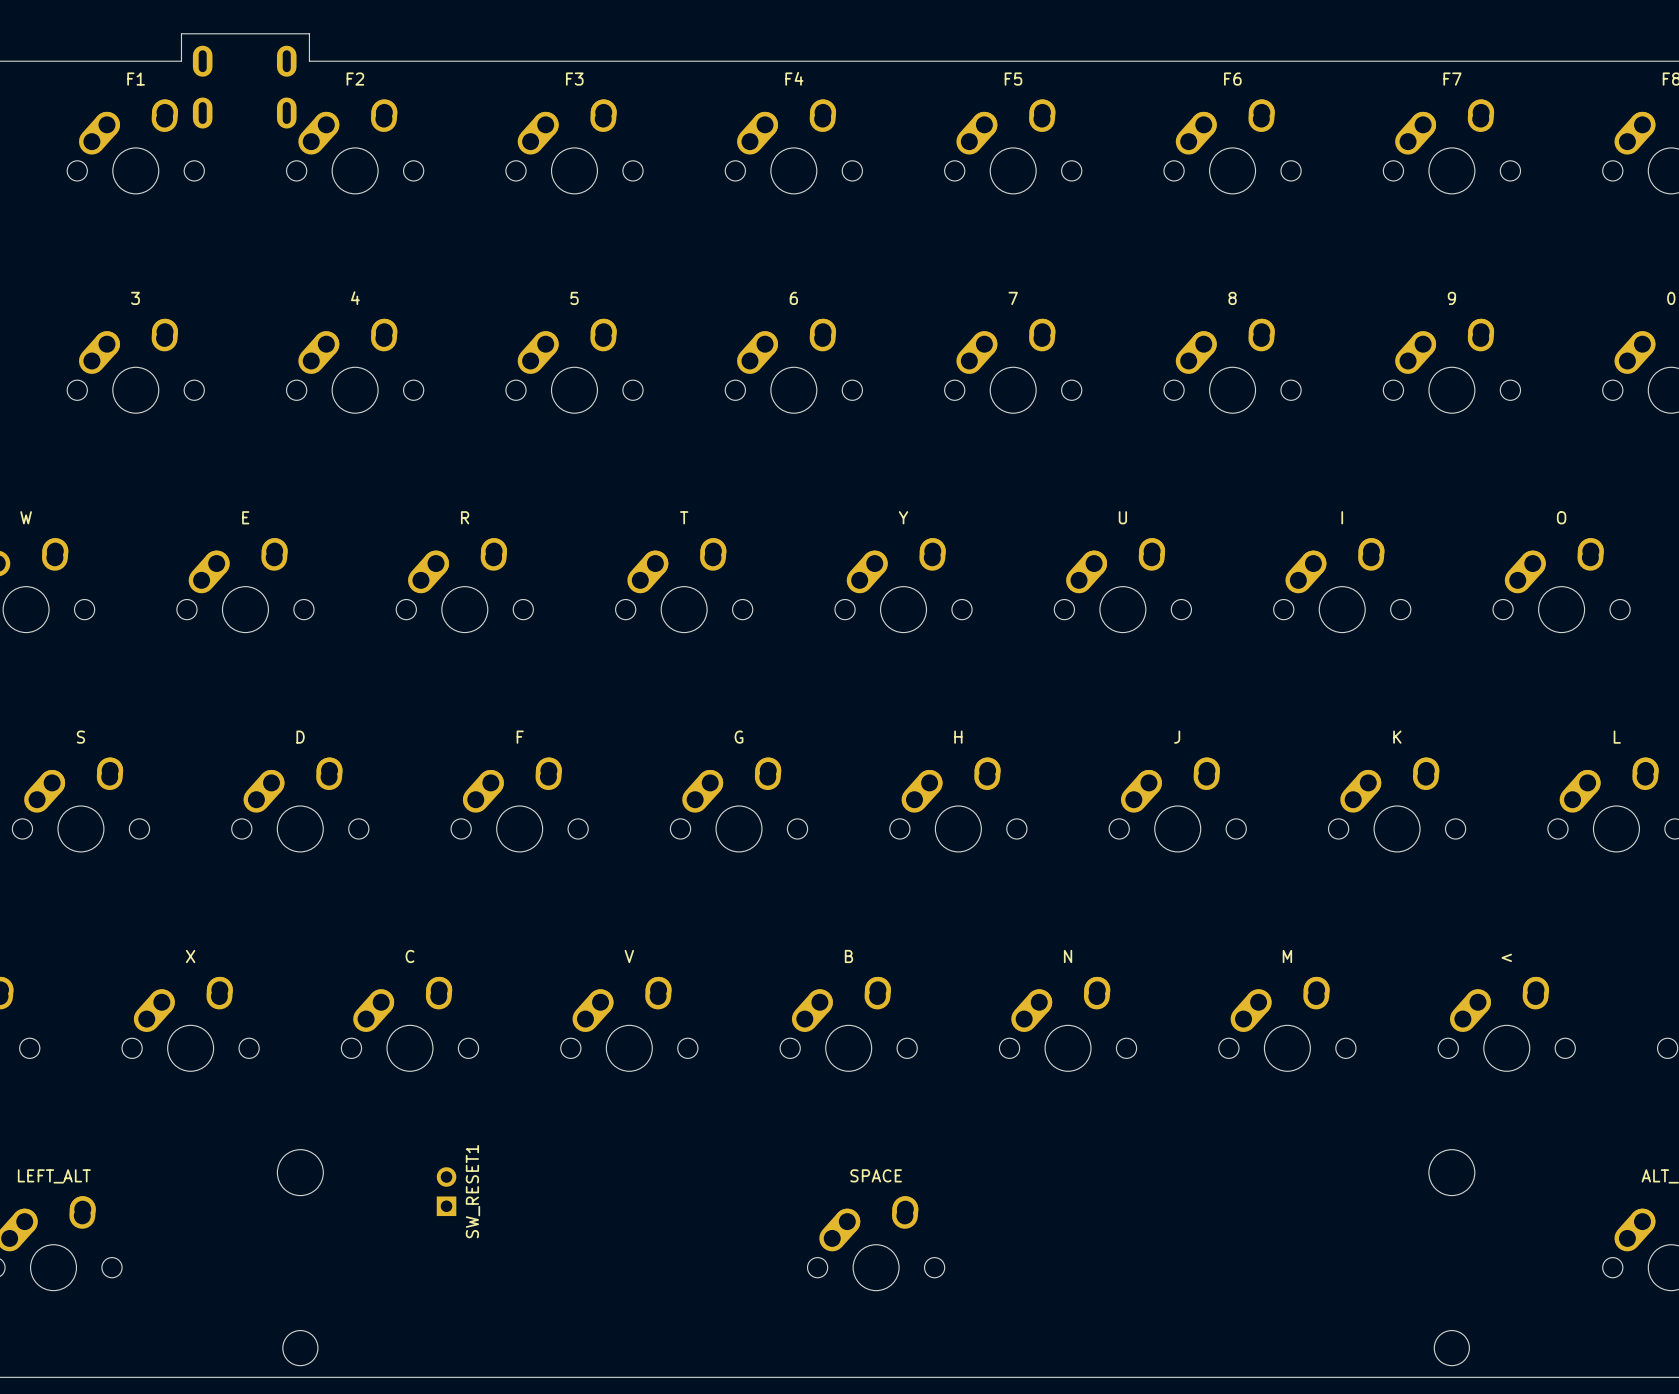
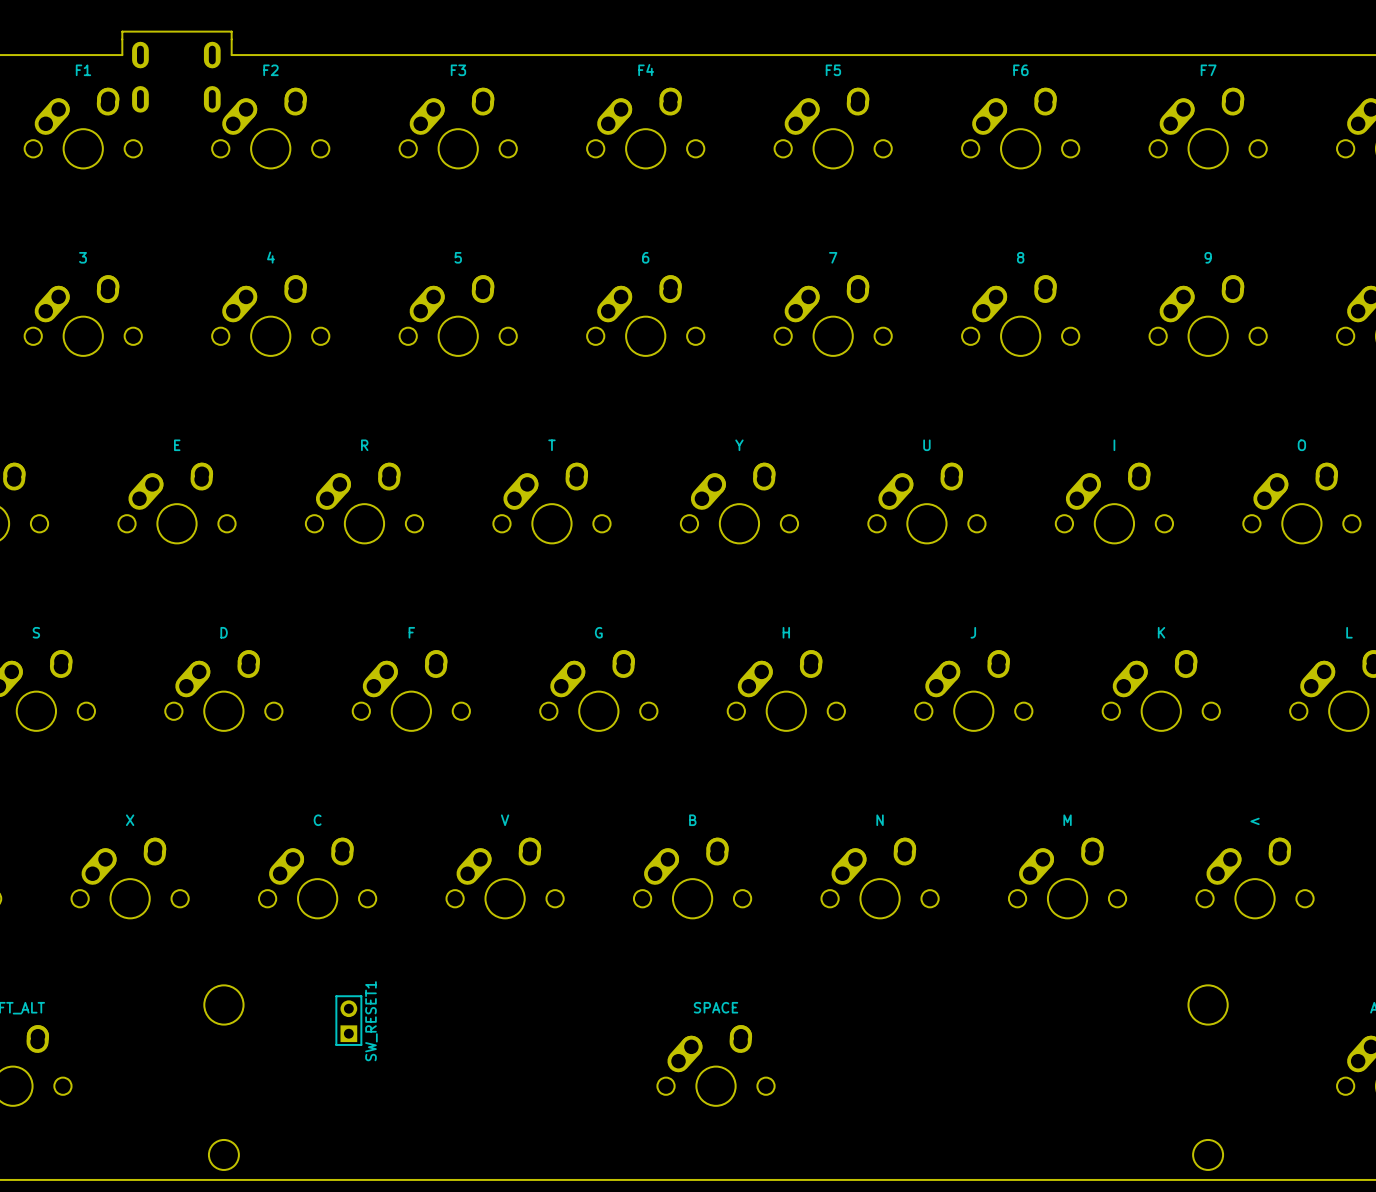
line: none -> (336, 996) (361, 996) (361, 1044) (336, 1044) (336, 996)

